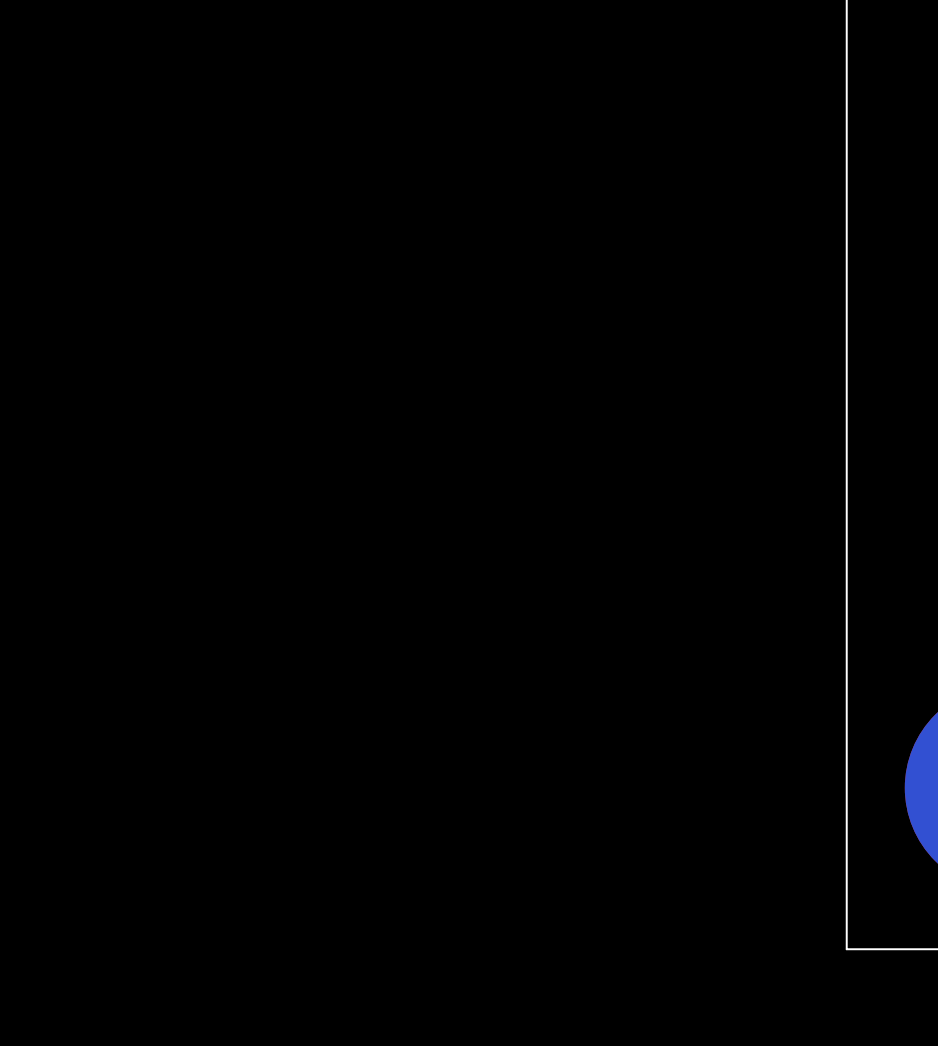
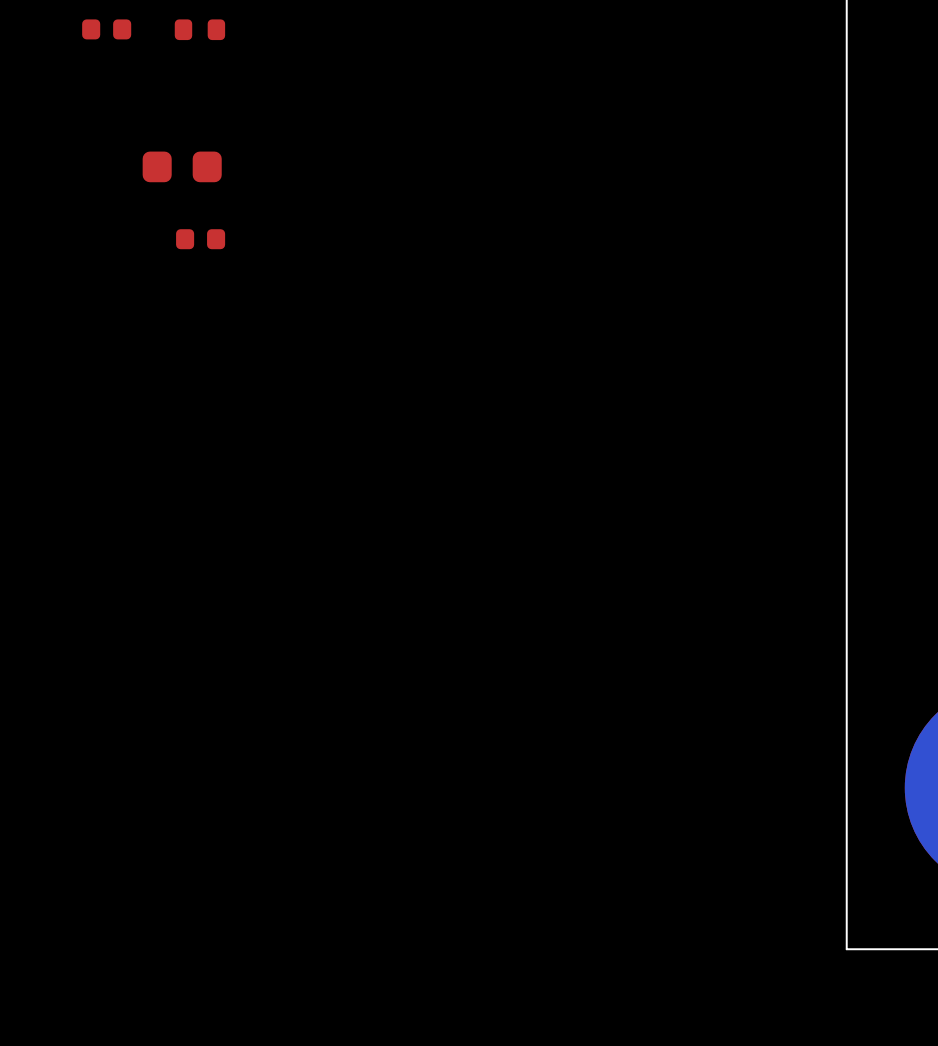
part: none -> (106, 29)
part: none -> (199, 29)
part: none -> (182, 166)
part: none -> (200, 239)

